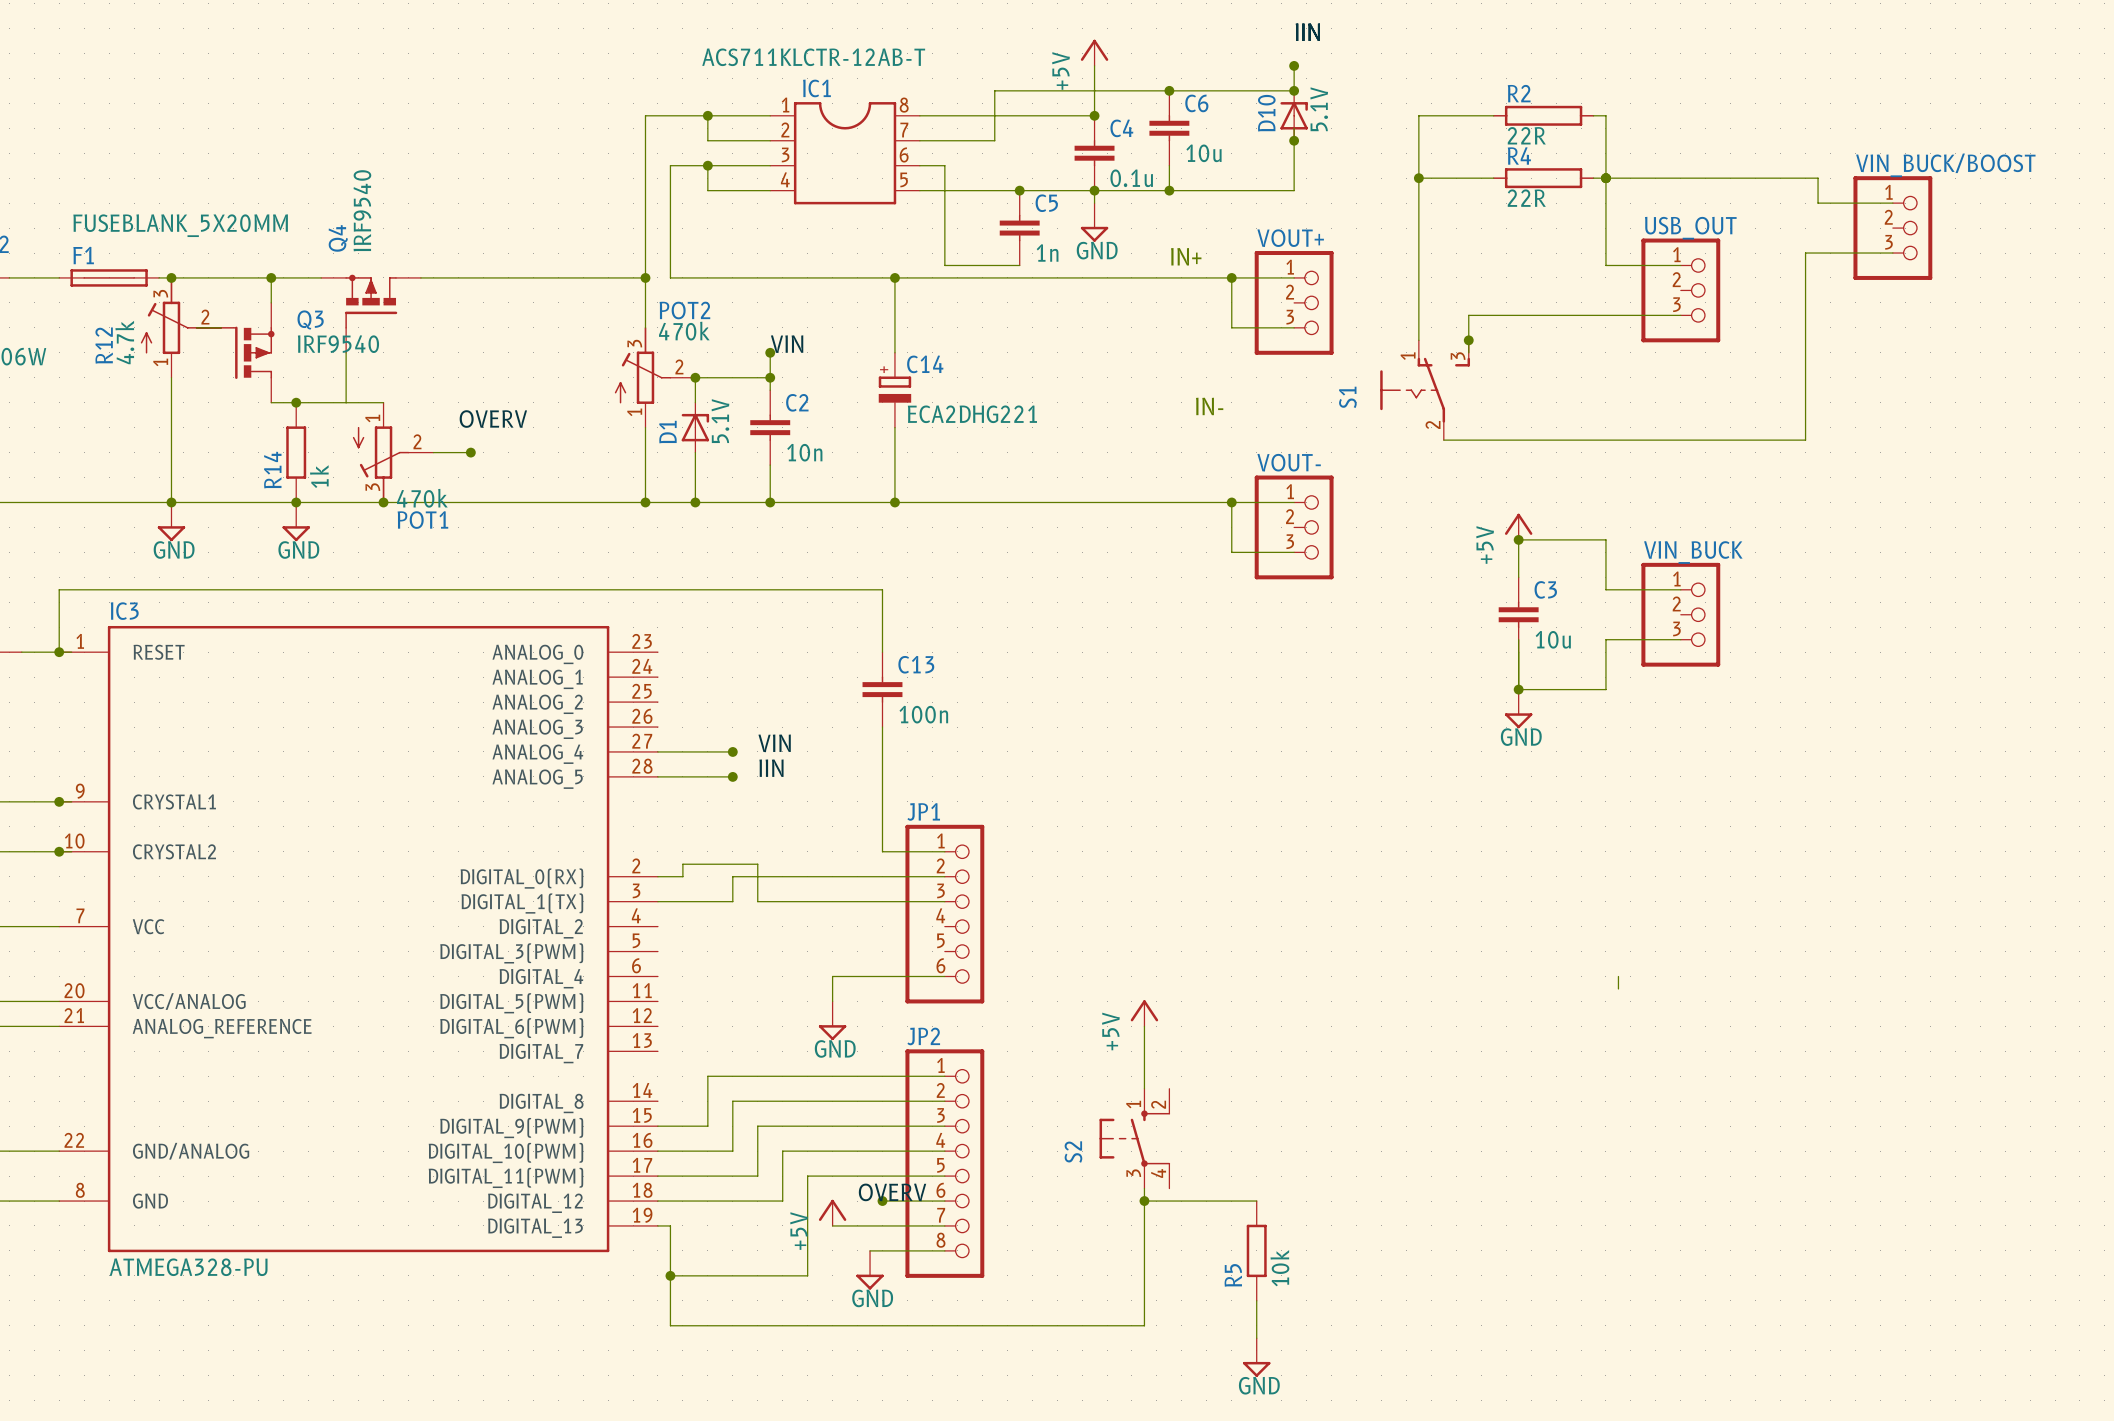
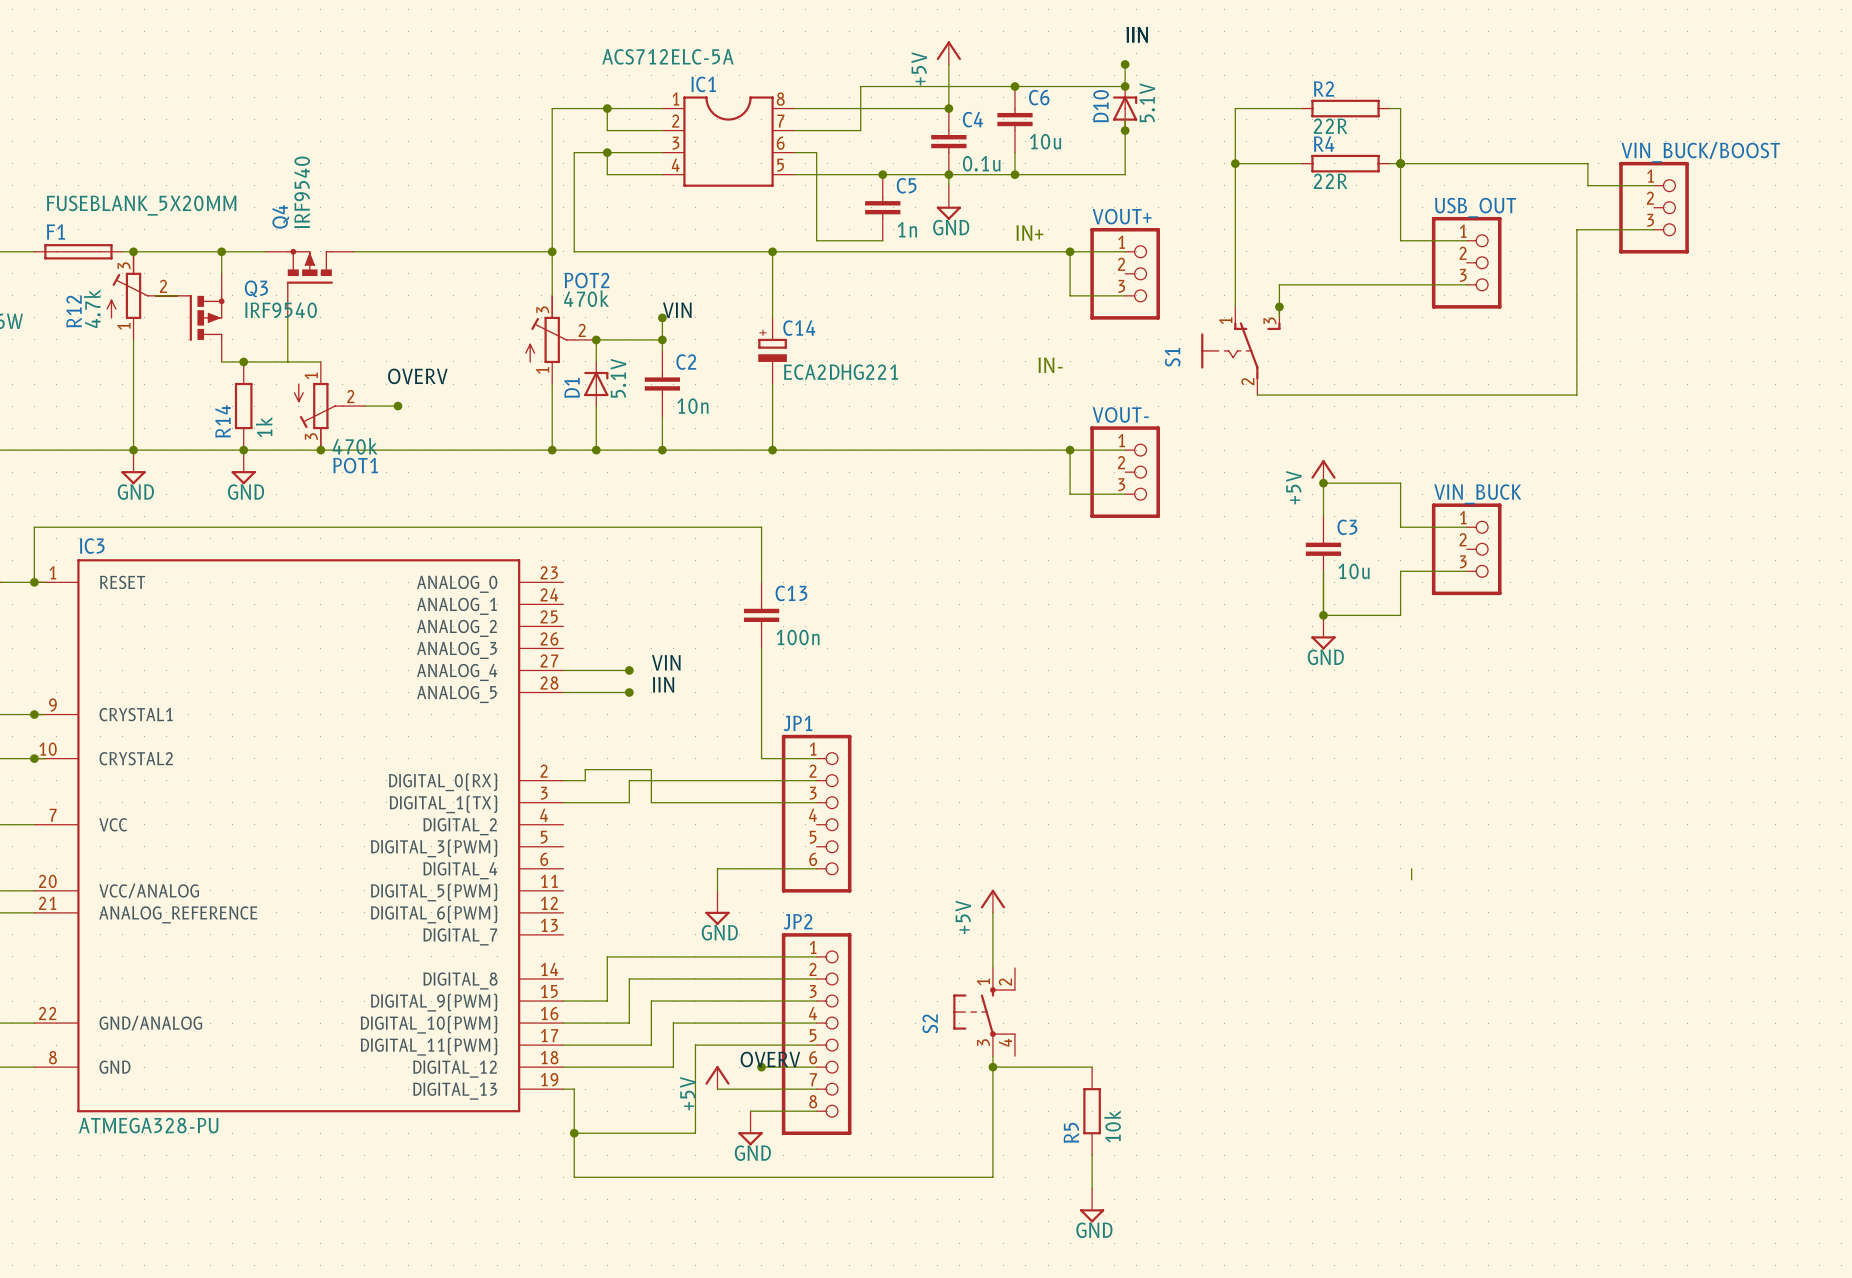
IC1 value: ACS711KLCTR-12AB-T (813, 57) -> ACS712ELC-5A (667, 56)

